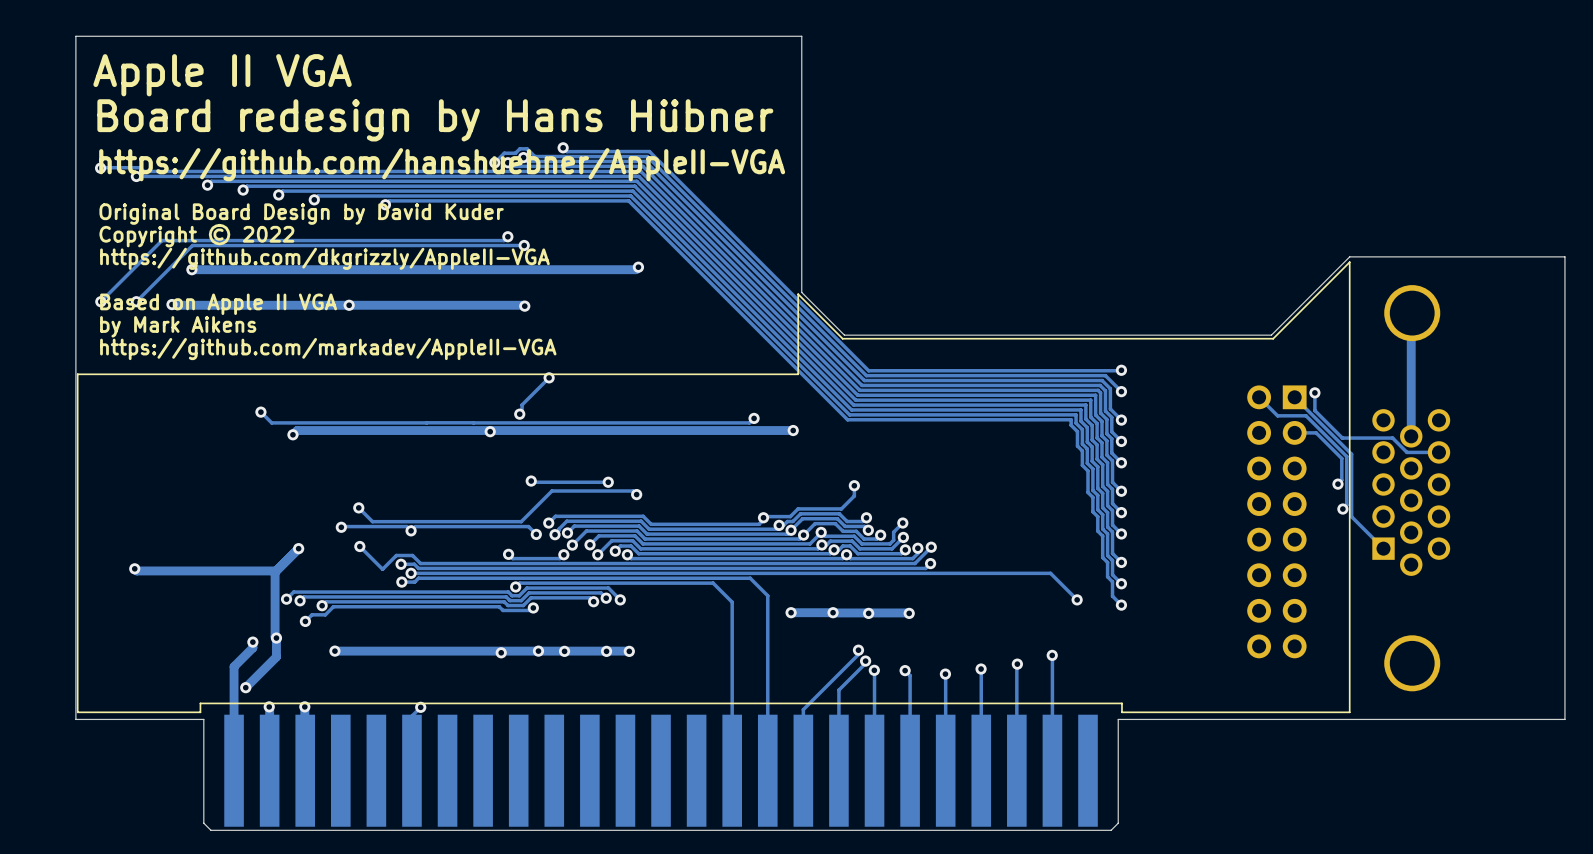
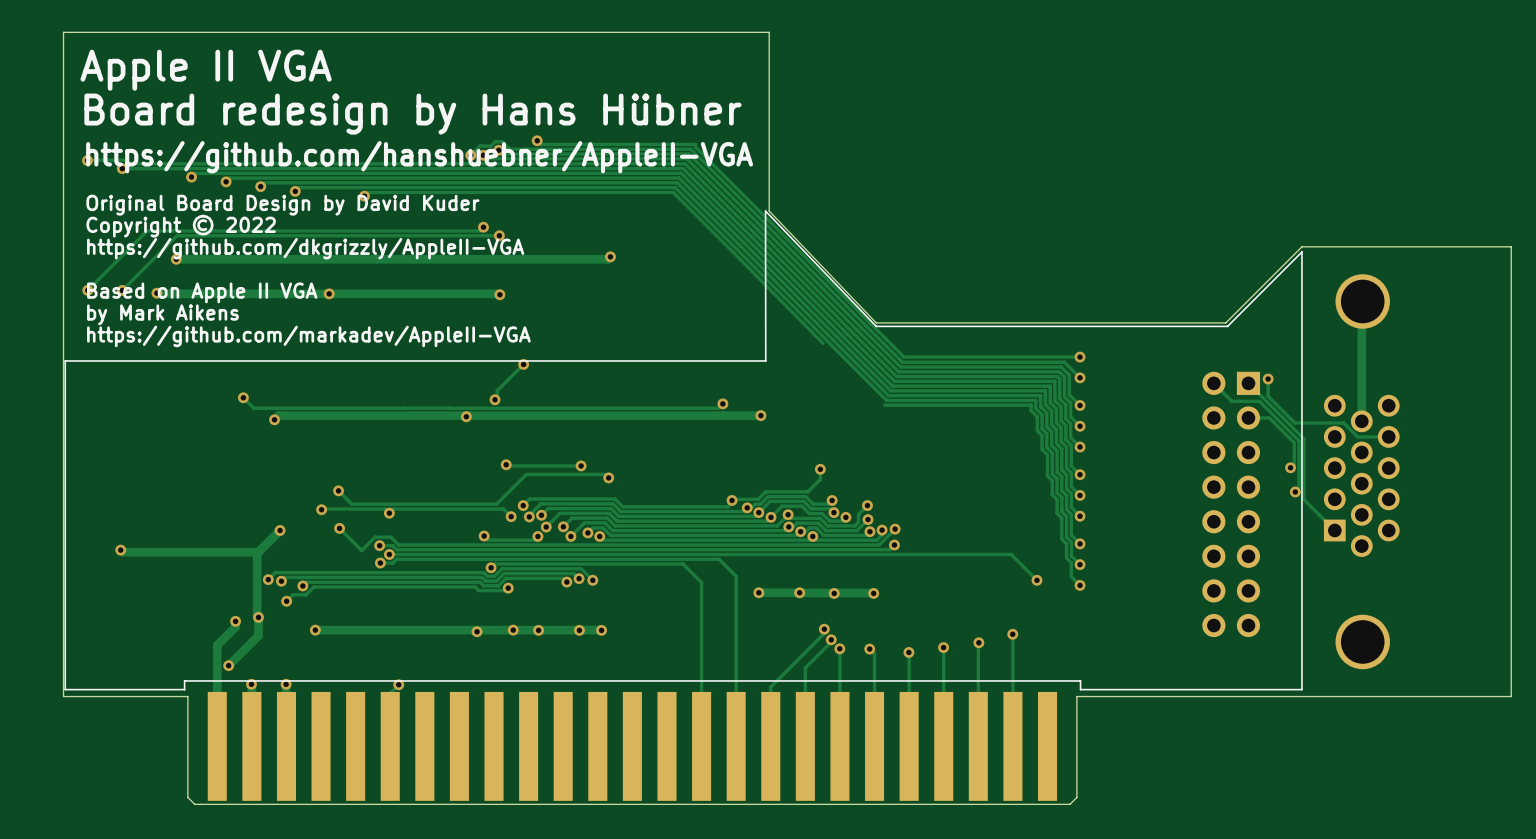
track: (649, 151) (868, 370) (1121, 370) -> (621, 144) (695, 144) (695, 147) (904, 357) (1080, 357)
track: (647, 156) (866, 375) (938, 375) -> (619, 149) (690, 149) (902, 362)
track: (645, 161) (864, 380) (936, 380) -> (617, 154) (688, 154) (861, 327)
track: (642, 166) (862, 385) (934, 385) -> (614, 158) (686, 158) (898, 371)
track: (640, 171) (859, 390) (932, 390) -> (612, 163) (685, 163) (851, 331)
track: (638, 176) (857, 395) (930, 395) -> (610, 168) (683, 168) (846, 333)
track: (636, 181) (855, 400) (928, 400) -> (608, 173) (681, 173) (842, 335)
track: (634, 186) (853, 405) (926, 405) -> (606, 178) (679, 178) (837, 337)
track: (632, 191) (851, 409) (924, 409) -> (604, 182) (677, 182) (832, 339)
track: (630, 196) (849, 414) (922, 414) -> (602, 187) (675, 187) (827, 341)
track: (628, 200) (847, 419) (920, 419) -> (601, 192) (673, 192) (823, 343)
board edge: (801, 220) (801, 292) (844, 335) (911, 335) -> (769, 211) (876, 322)
line: (911, 338) (842, 338) (798, 294) (798, 374) -> (876, 326) (765, 211) (765, 360)
track: none -> (861, 327) (900, 367)
track: none -> (851, 331) (896, 376)
track: none -> (846, 333) (894, 381)
track: none -> (842, 335) (892, 386)
track: none -> (837, 337) (890, 390)
track: none -> (832, 339) (888, 395)
track: none -> (827, 341) (886, 400)

